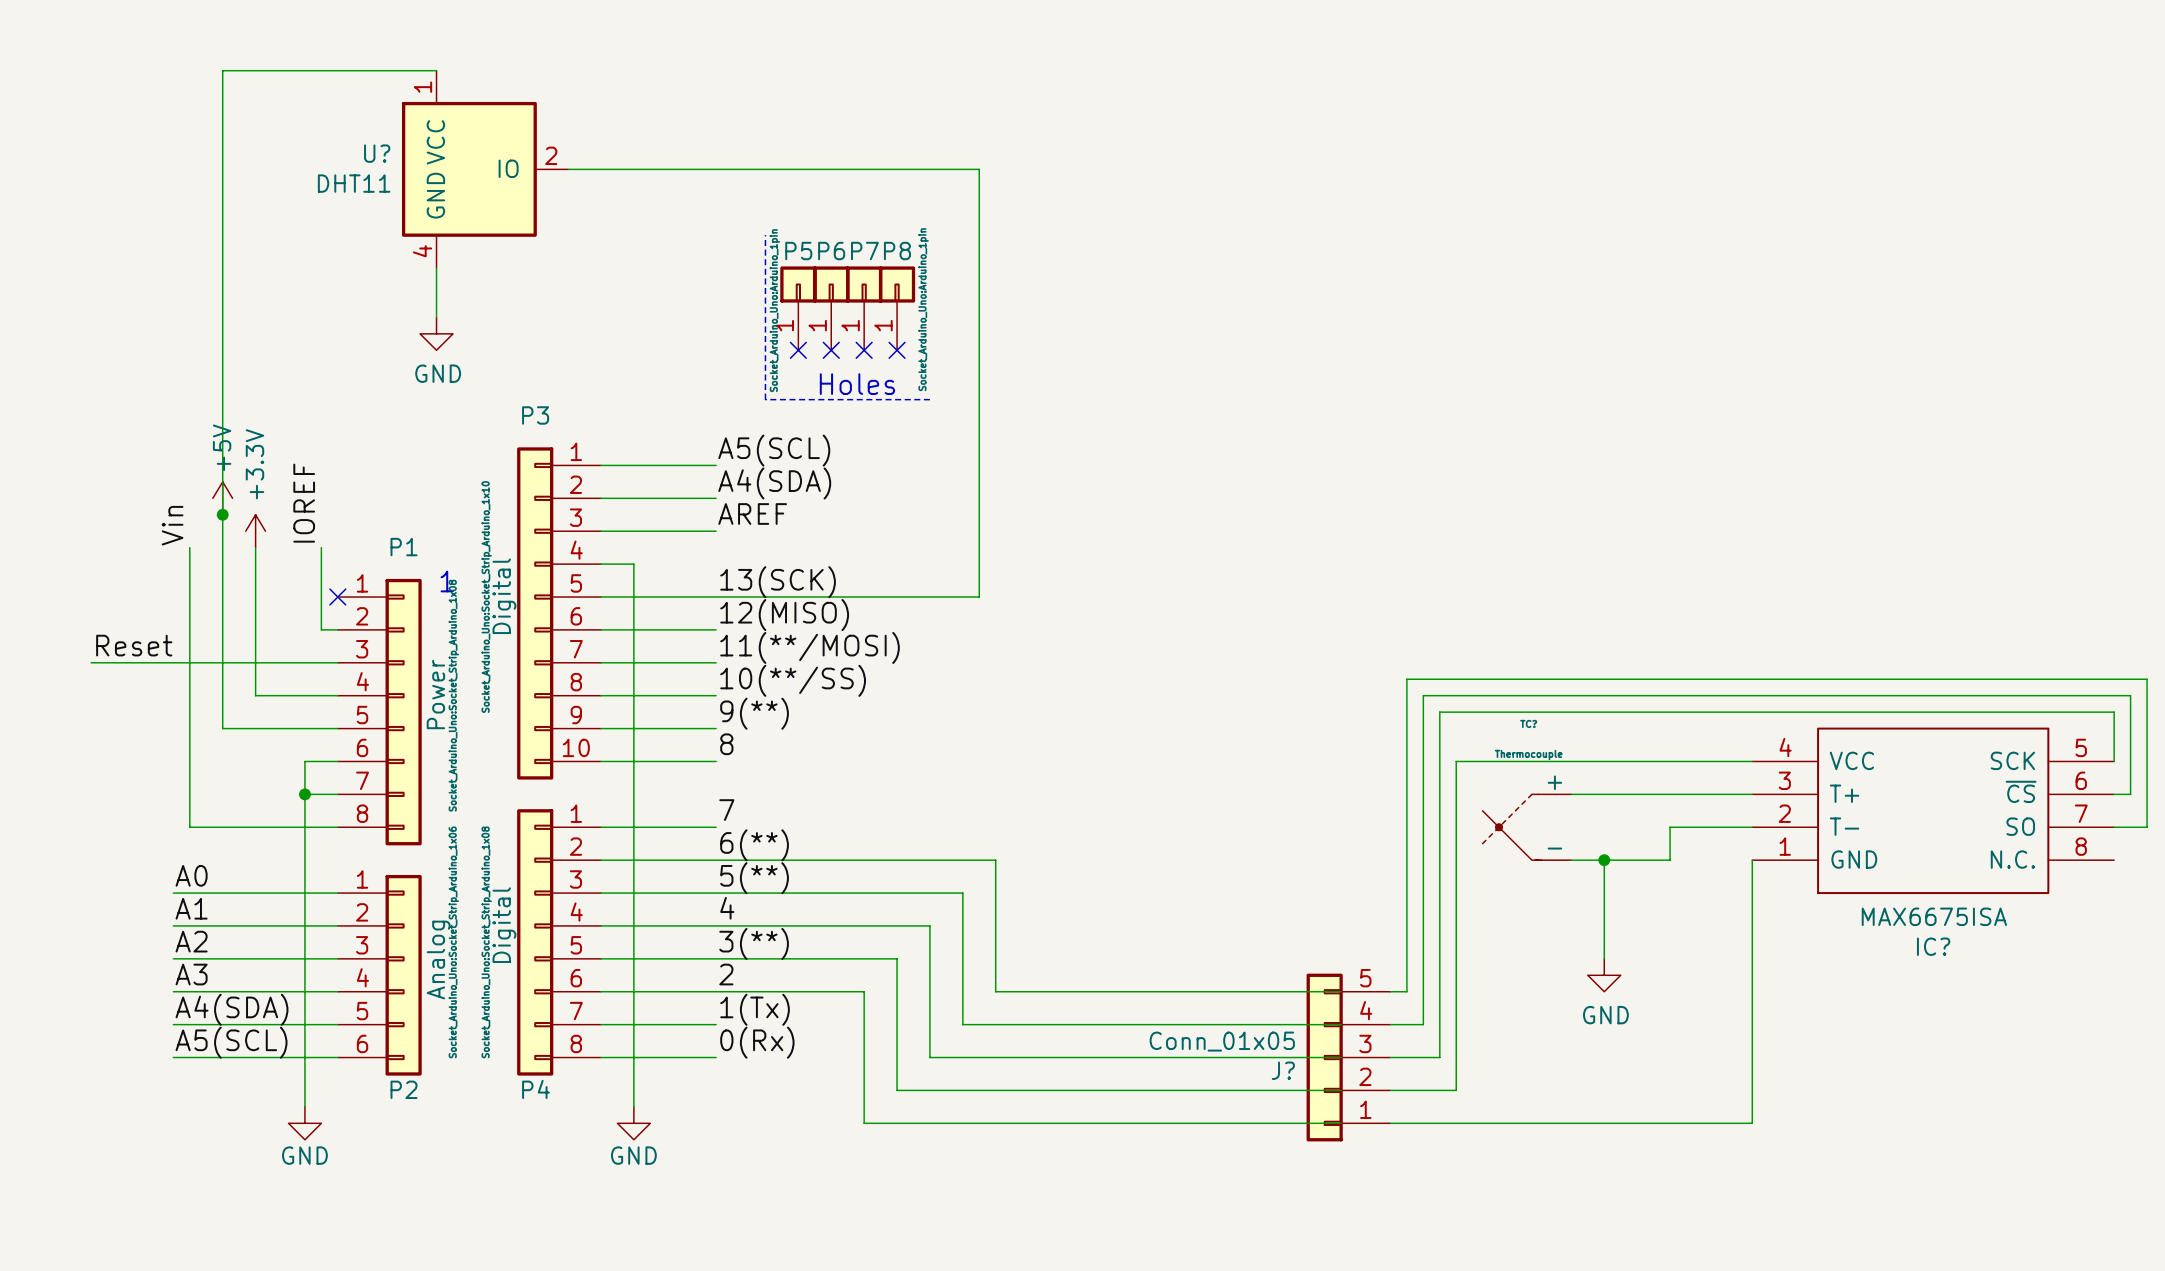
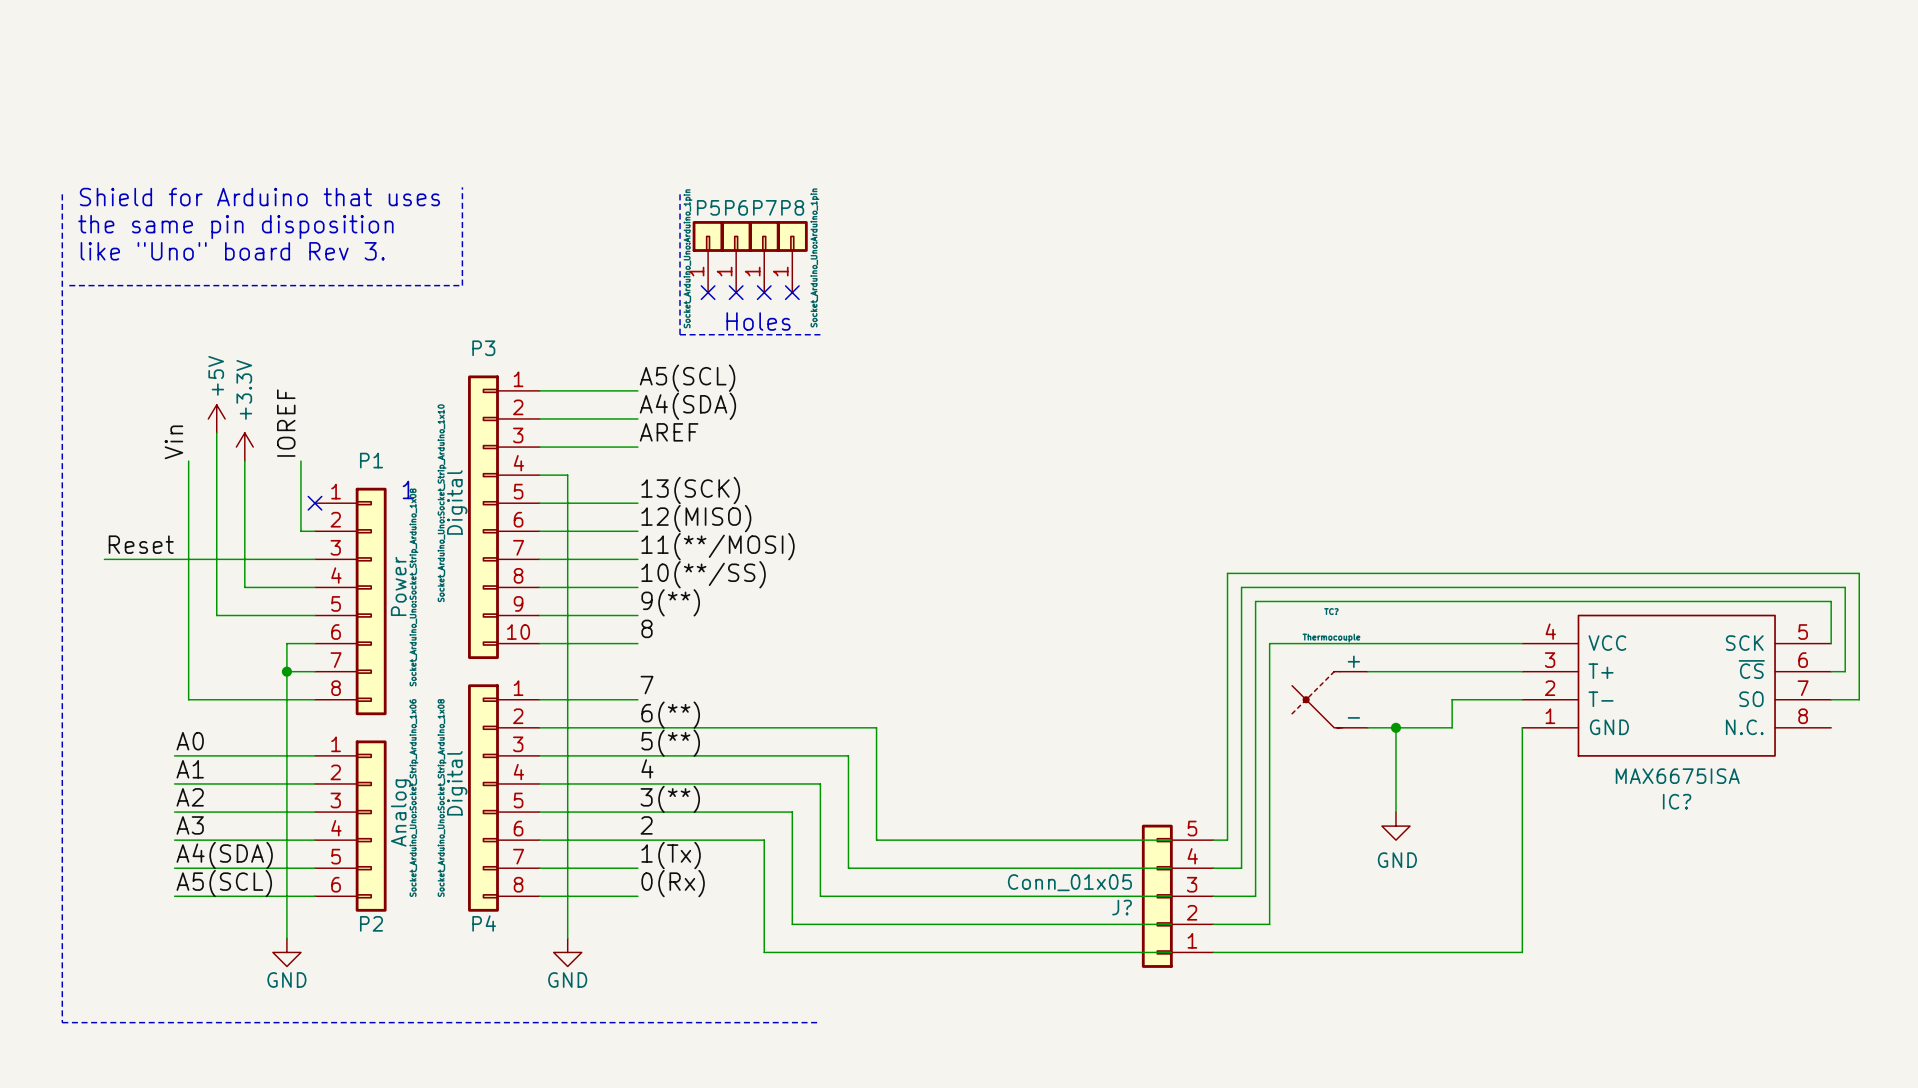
wire: (436, 70) (222, 70) (222, 514) -> none
U?: DHT11 (485, 169) -> none
wire: (568, 169) (979, 169) (979, 597) (716, 597) -> none
line: none -> (462, 187) (462, 285) (69, 285)
line: none -> (62, 194) (62, 1022) (820, 1022)
text: none -> Shield for Arduino that uses (259, 197)
wire: (436, 268) (436, 317) -> none
text: none -> the same pin disposition (235, 226)
text: none -> like "Uno" board Rev 3. (232, 251)
power symbol: GND (436, 333) -> none
junction: (222, 514) -> none

